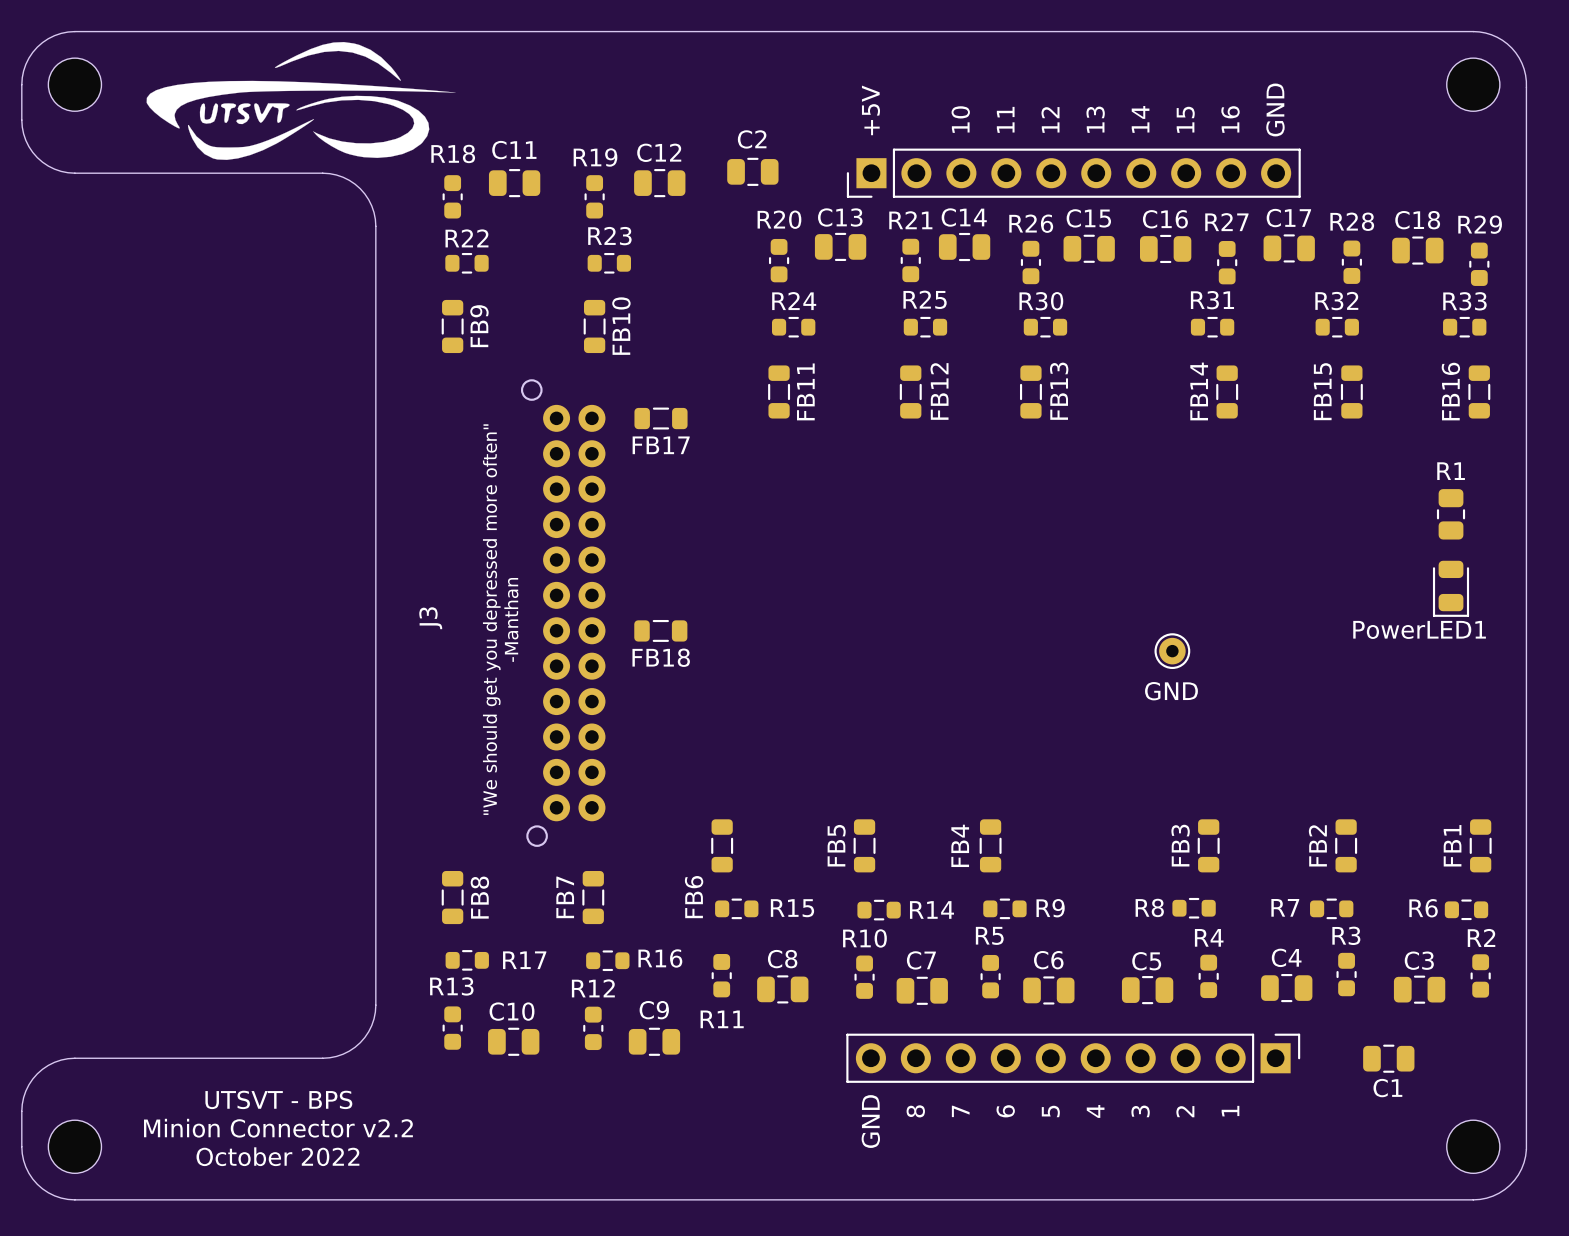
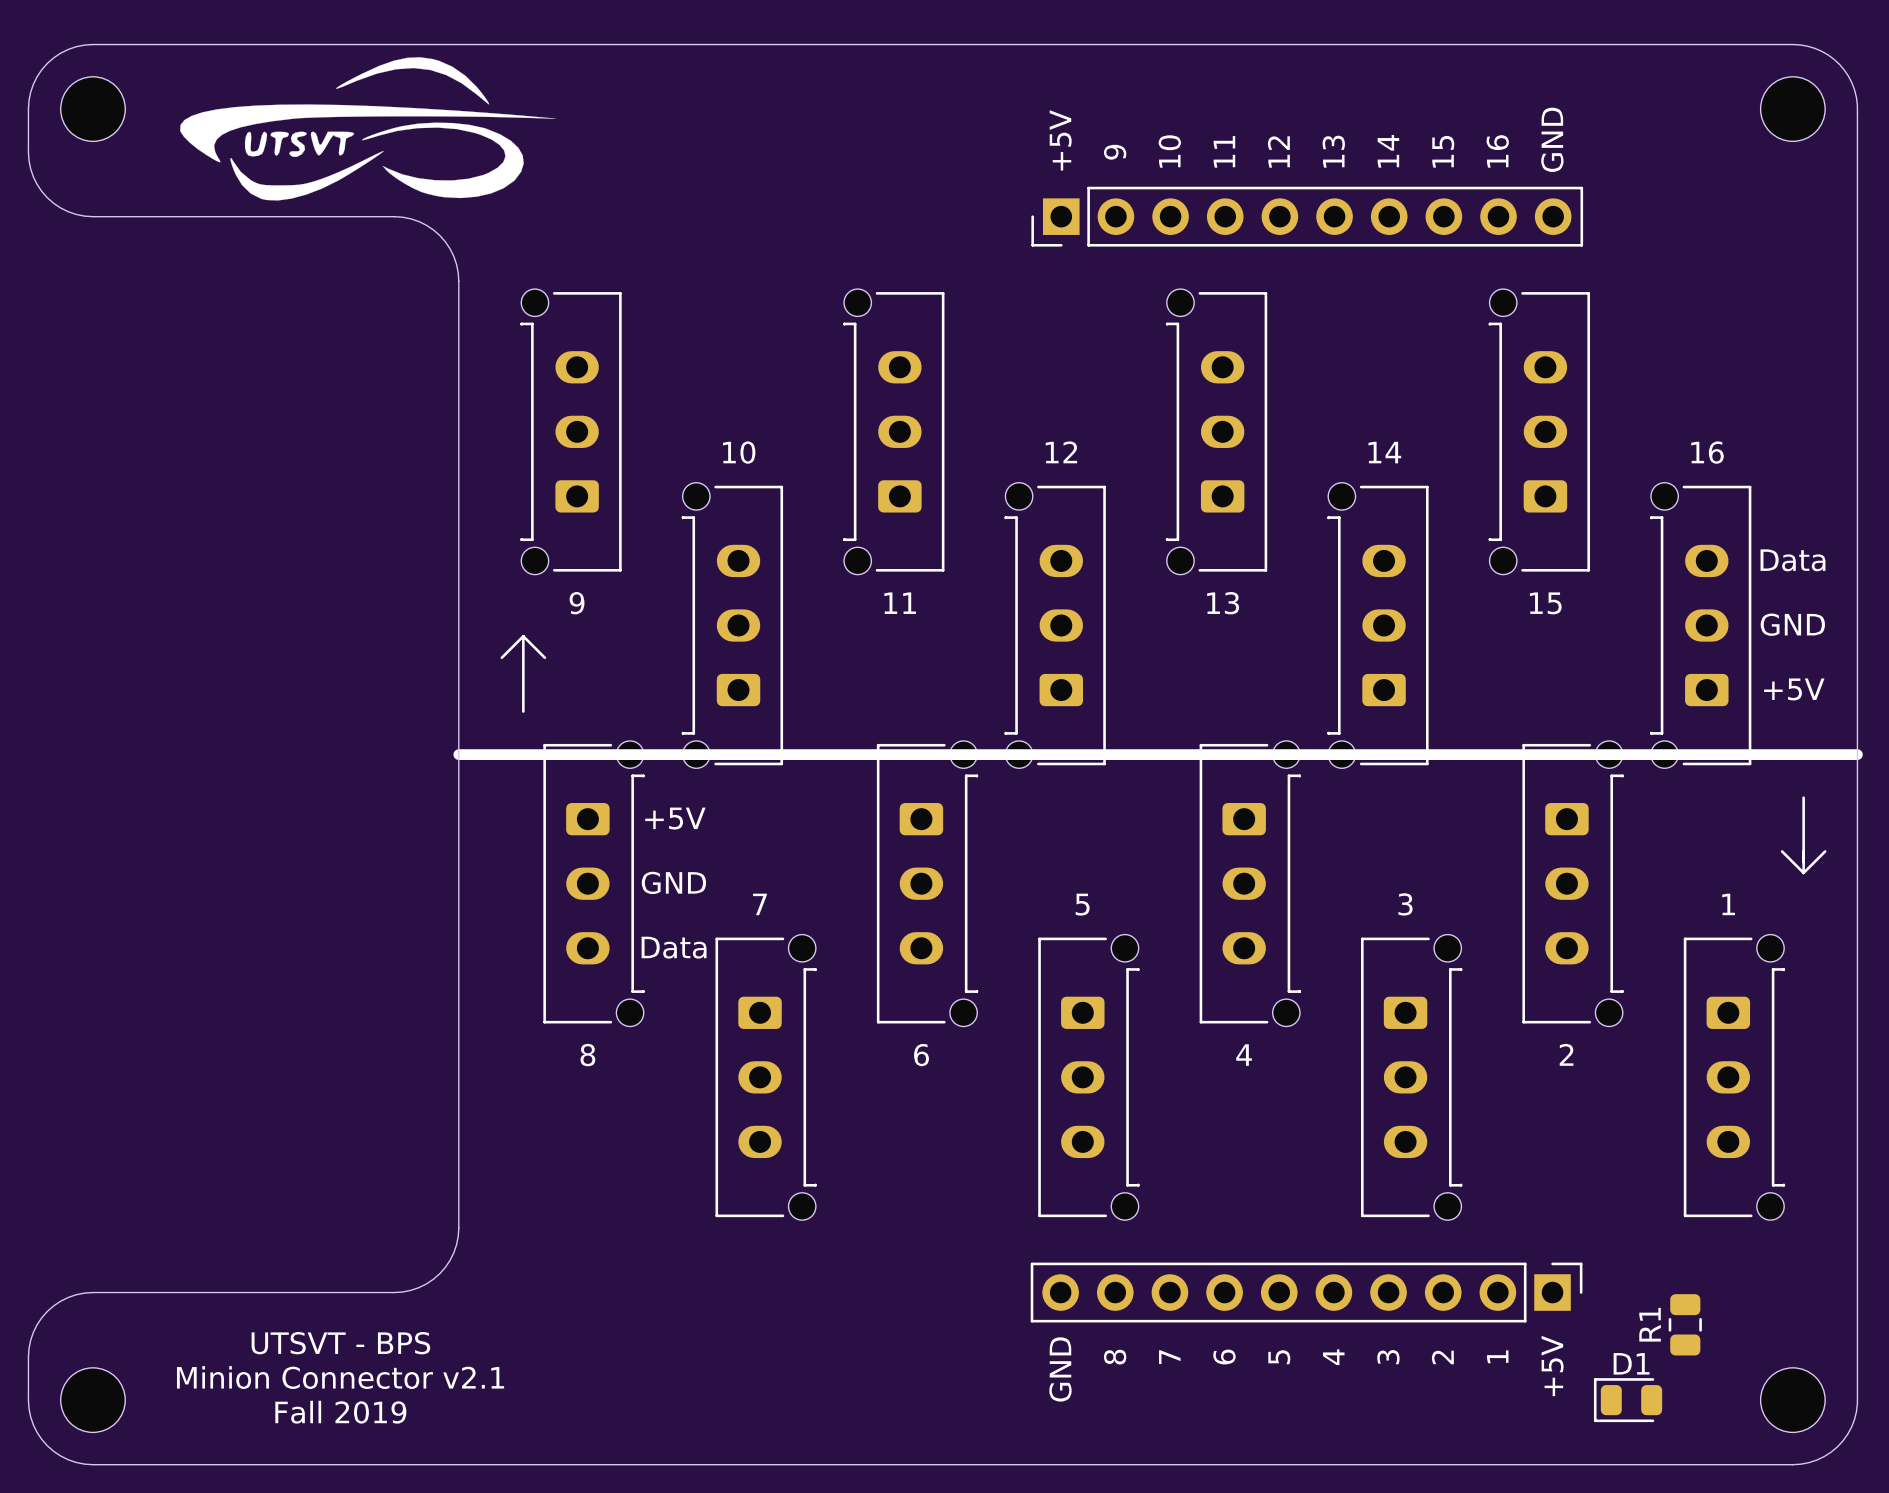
text: none -> 9 (1115, 152)
C2: (752, 171) -> none
C11: (514, 183) -> none
C12: (659, 183) -> none
R18: (452, 196) -> none
R19: (594, 196) -> none
C13: (840, 246) -> none
C14: (964, 247) -> none
C15: (1089, 248) -> none
C16: (1165, 248) -> none
C17: (1289, 248) -> none
C18: (1417, 250) -> none
R20: (779, 260) -> none
R21: (910, 260) -> none
R26: (1030, 262) -> none
R27: (1227, 262) -> none
R28: (1351, 262) -> none
R22: (466, 263) -> none
R23: (609, 263) -> none
R29: (1479, 264) -> none
FB9: (452, 326) -> none
FB10: (594, 326) -> none
R24: (793, 327) -> none
R25: (925, 327) -> none
R30: (1045, 327) -> none
R31: (1212, 327) -> none
R32: (1337, 327) -> none
R33: (1464, 327) -> none
part: none -> (571, 431)
part: none -> (893, 431)
part: none -> (1216, 431)
part: none -> (1539, 431)
text: none -> 10 (739, 452)
text: none -> 12 (1061, 452)
text: none -> 14 (1384, 452)
text: none -> 16 (1707, 452)
FB11: (779, 391) -> none
FB12: (910, 391) -> none
FB13: (1030, 391) -> none
FB14: (1227, 391) -> none
FB15: (1351, 391) -> none
FB16: (1479, 391) -> none
FB17: (661, 418) -> none
text: none -> Data (1792, 560)
R1 name position: R1 (1451, 471) -> R1 (1650, 1324)
R1 footprint: [1436, 489, 1466, 540] -> [1668, 1294, 1702, 1356]
text: none -> 9 (577, 603)
text: none -> 11 (900, 603)
text: none -> 13 (1223, 603)
text: none -> 15 (1545, 603)
text: none -> GND (1792, 624)
part: none -> (732, 625)
part: none -> (1055, 625)
part: none -> (1377, 625)
part: none -> (1700, 625)
line: none -> (523, 636) (544, 657)
line: none -> (523, 636) (501, 657)
line: none -> (523, 636) (523, 711)
text: none -> +5V (1794, 689)
PowerLED1: (1451, 588) -> none
J3: (563, 613) -> none
line: none -> (458, 754) (1857, 754)
text: "We should get you depressed more often" (491, 619) -> none
text: -Manthan (511, 619) -> none
FB18: (660, 630) -> none
GND: (1172, 651) -> none
line: none -> (1803, 797) (1803, 872)
text: none -> +5V (675, 818)
line: none -> (1782, 851) (1803, 872)
line: none -> (1825, 851) (1803, 872)
part: none -> (594, 883)
text: none -> GND (673, 882)
part: none -> (927, 883)
part: none -> (1250, 883)
part: none -> (1573, 883)
text: none -> 7 (759, 904)
text: none -> 3 (1405, 904)
text: none -> 1 (1728, 904)
text: none -> 5 (1082, 904)
text: none -> Data (674, 947)
FB6: (722, 845) -> none
FB5: (864, 845) -> none
FB4: (990, 845) -> none
FB3: (1208, 845) -> none
FB2: (1346, 845) -> none
FB1: (1480, 845) -> none
text: none -> 8 (587, 1055)
text: none -> 6 (921, 1055)
text: none -> 4 (1244, 1055)
text: none -> 2 (1566, 1054)
part: none -> (766, 1077)
part: none -> (1088, 1077)
part: none -> (1411, 1077)
part: none -> (1734, 1077)
FB8: (452, 897) -> none
FB7: (593, 897) -> none
R15: (736, 908) -> none
R9: (1004, 908) -> none
R8: (1194, 908) -> none
R7: (1331, 908) -> none
R6: (1466, 909) -> none
R14: (879, 910) -> none
R17: (467, 960) -> none
R16: (607, 960) -> none
R3: (1346, 974) -> none
R11: (721, 975) -> none
R2: (1480, 975) -> none
R5: (990, 976) -> none
R4: (1208, 976) -> none
R10: (864, 977) -> none
C4: (1286, 988) -> none
C8: (782, 989) -> none
C3: (1419, 989) -> none
C7: (922, 990) -> none
C6: (1048, 990) -> none
C5: (1147, 990) -> none
R13: (452, 1028) -> none
R12: (593, 1028) -> none
C10: (513, 1041) -> none
C9: (654, 1041) -> none
C1: (1388, 1058) -> none
text: none -> +5V (1552, 1365)
text: Minion Connector v2.2 (278, 1128) -> Minion Connector v2.1 (340, 1377)
D1: none -> (1628, 1400)
text: October 2022 (277, 1156) -> Fall 2019 (340, 1412)

